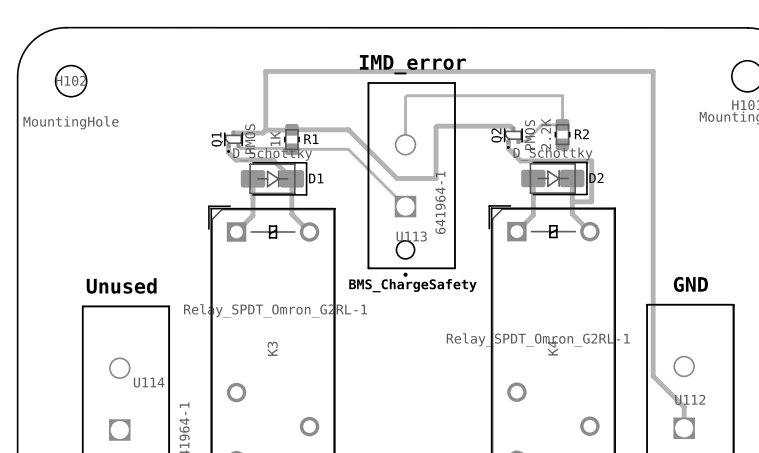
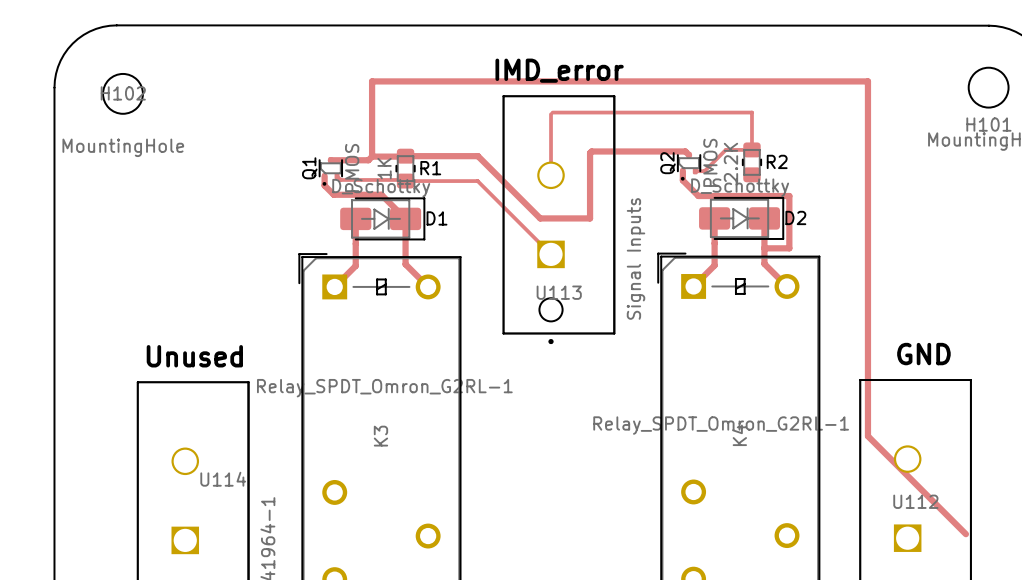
U113 value: 641964-1 (440, 202) -> Signal Inputs (636, 258)
text: BMS_ChargeSafety (412, 285) -> none
track: (653, 348) (653, 376) (684, 407) (684, 428) -> (867, 436) (965, 534)

